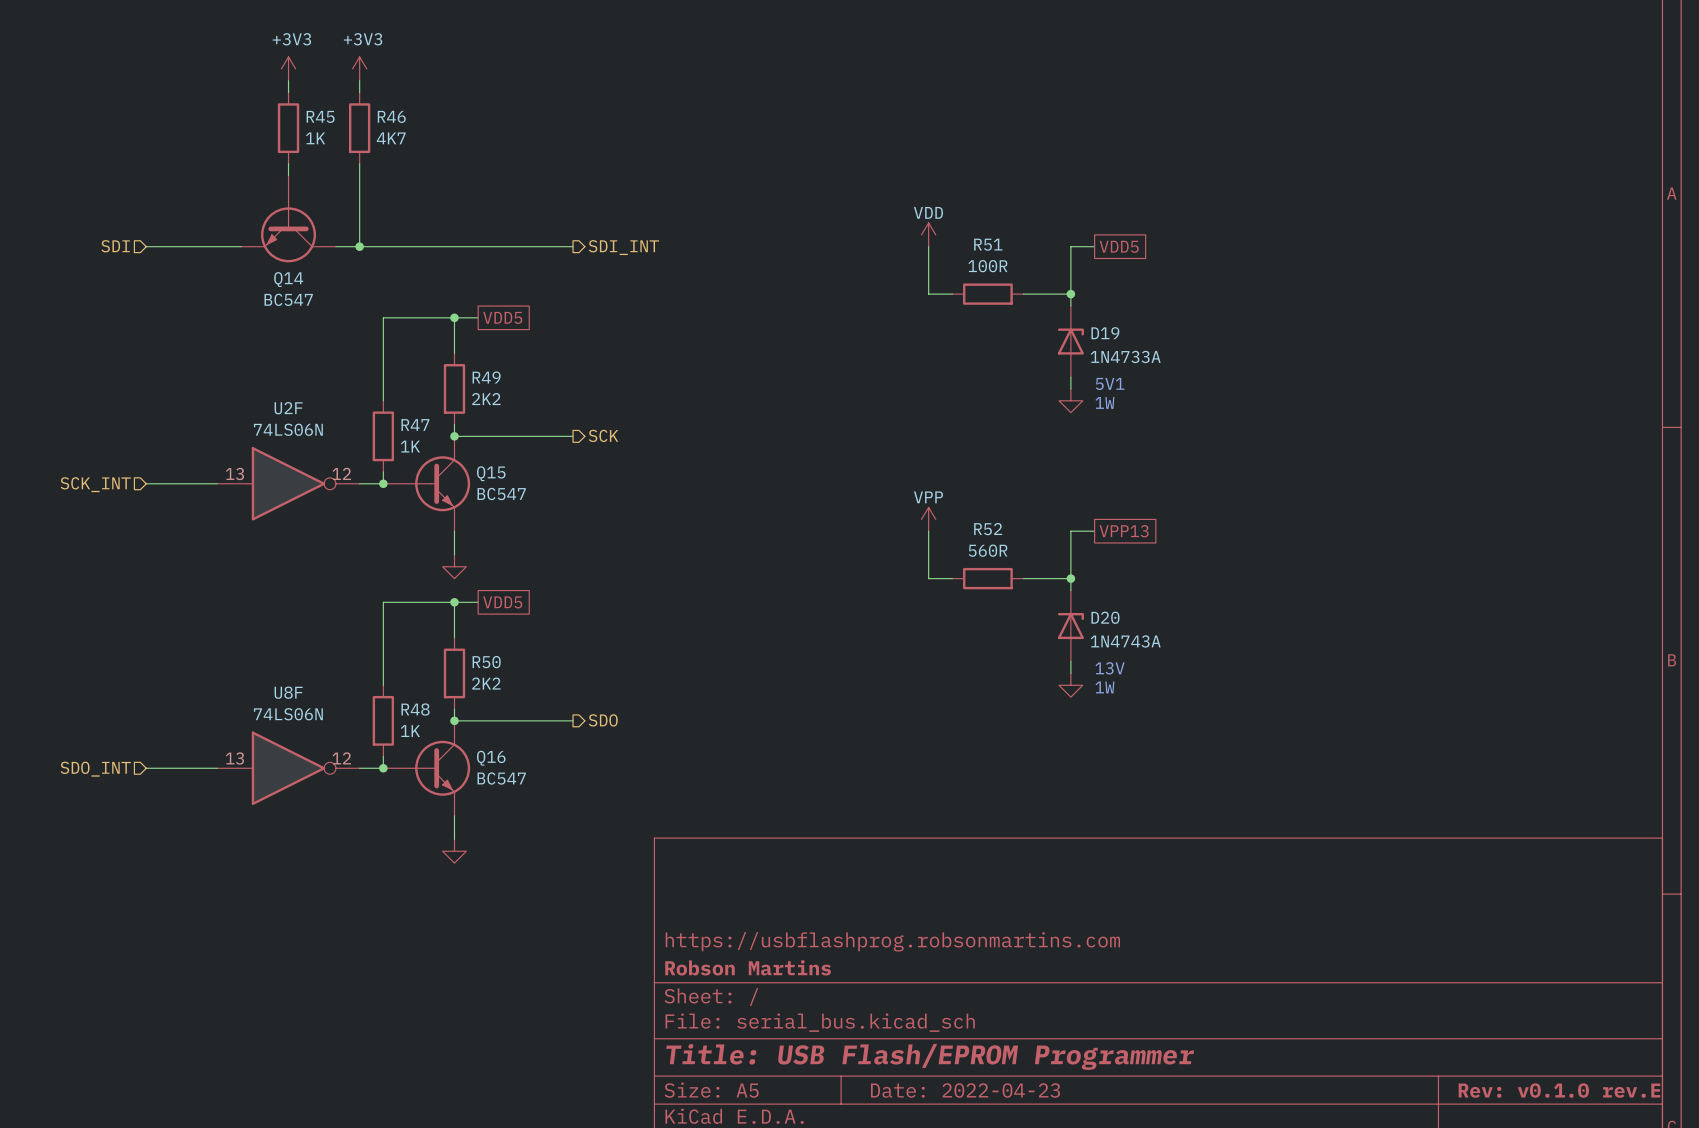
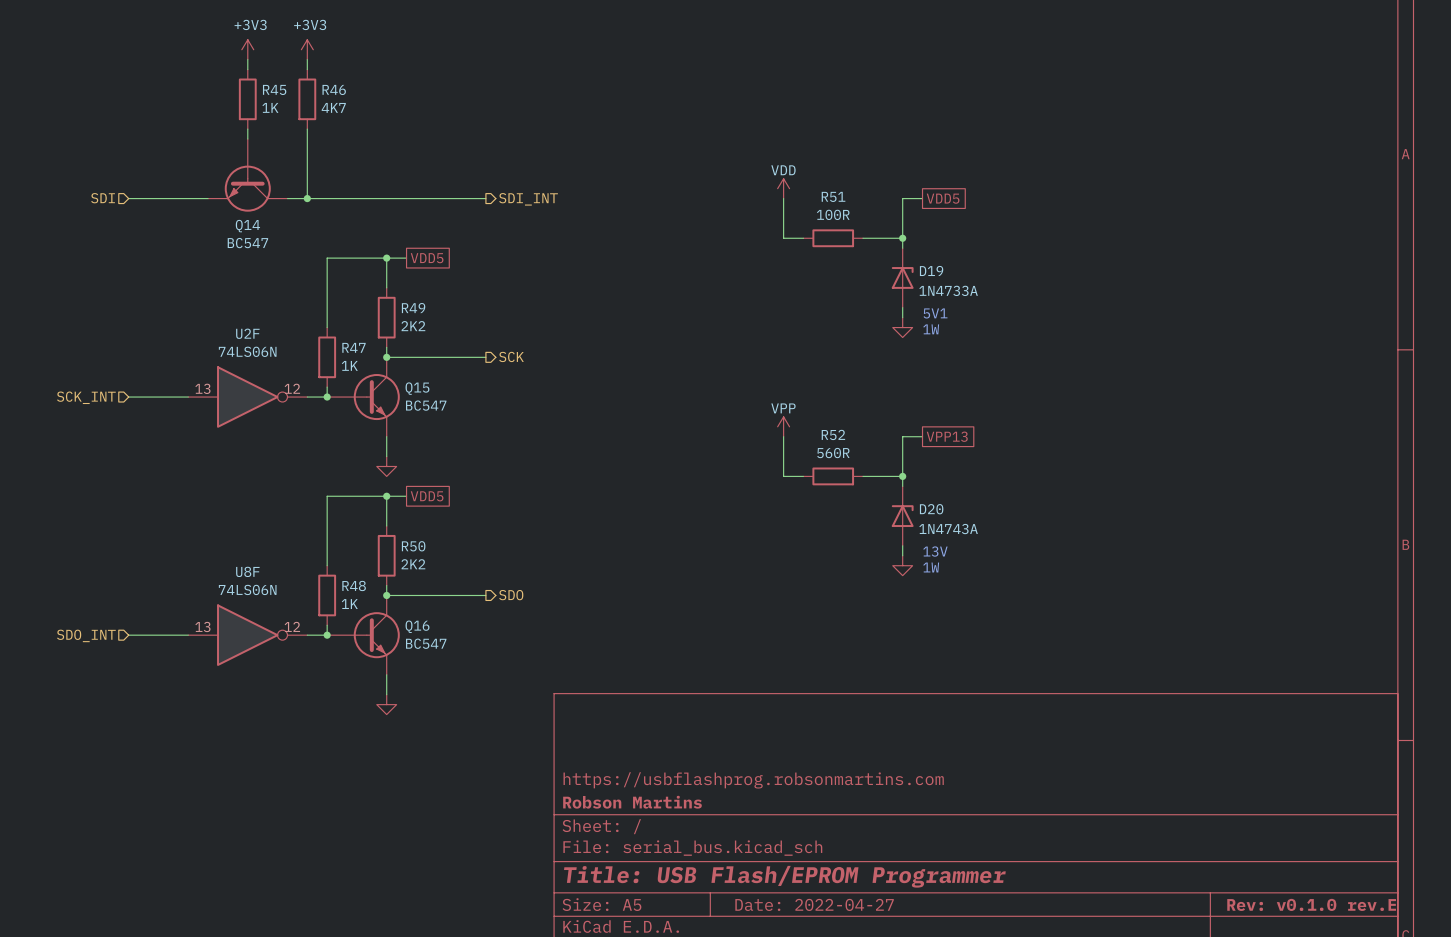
title block: Date: 2022-04-23 (965, 1090) -> Date: 2022-04-27 (814, 904)

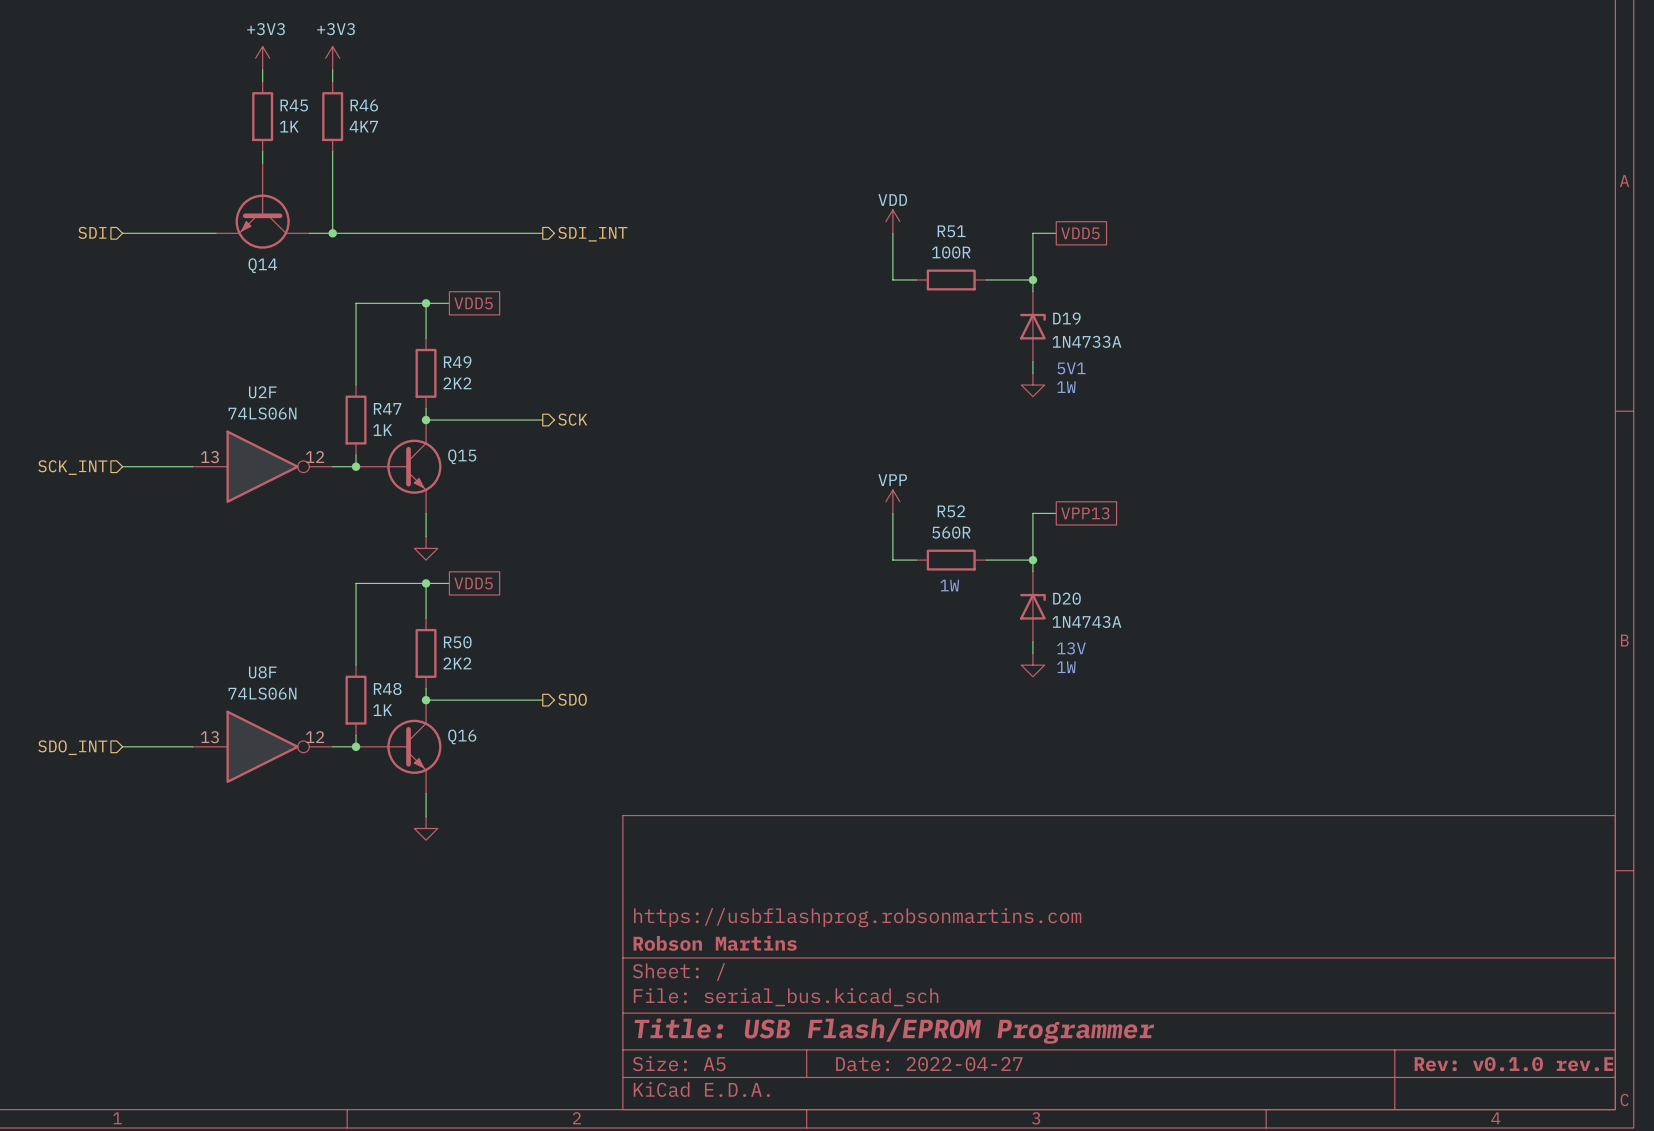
Q14 value: BC547 (247, 243) -> none
Q15 value: BC547 (426, 405) -> none
text: none -> 1W (949, 585)
Q16 value: BC547 (426, 643) -> none

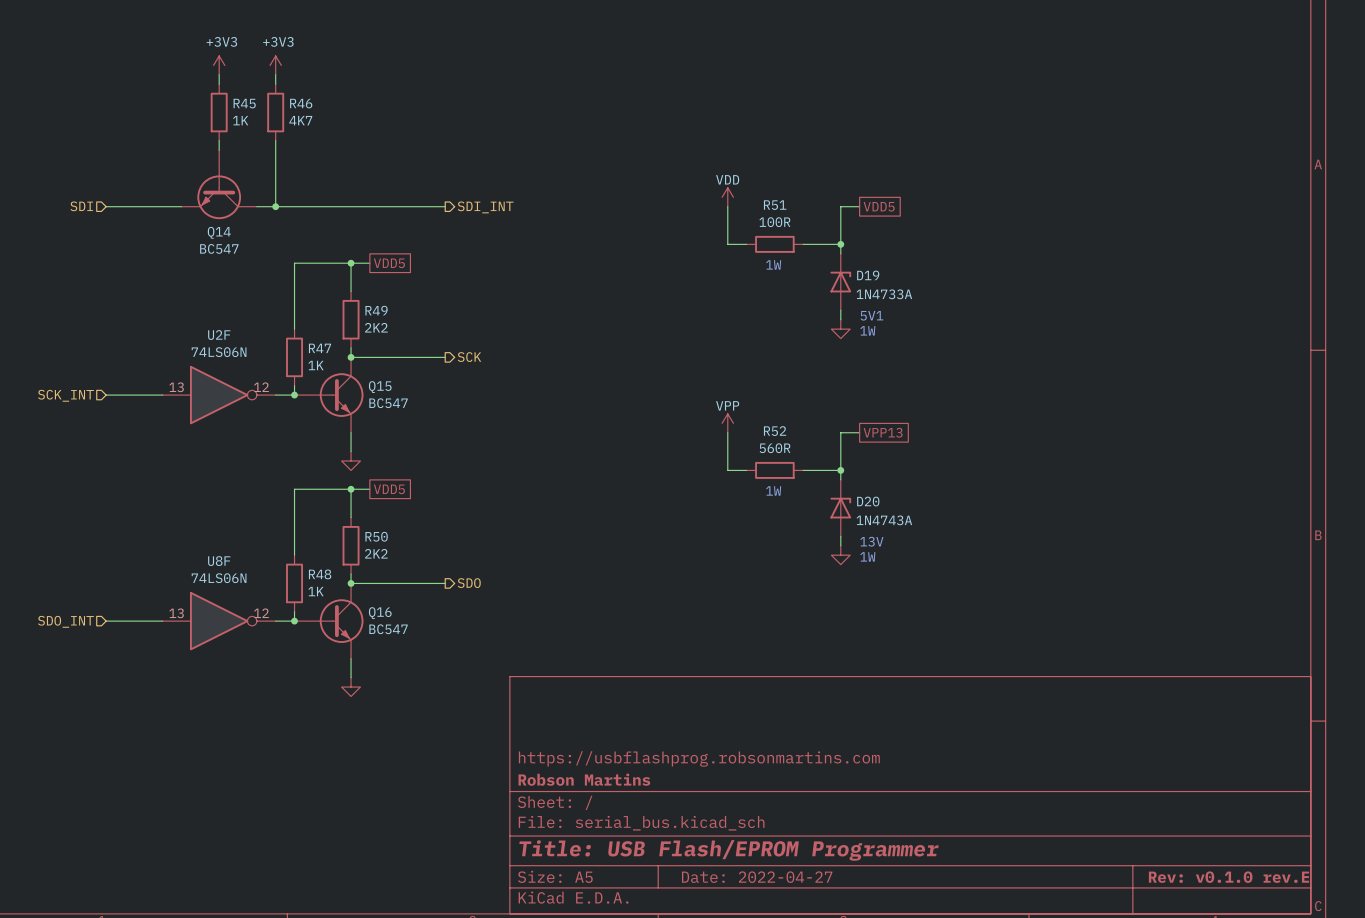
Q14 value: none -> BC547 (219, 248)
text: none -> 1W (773, 264)
Q15 value: none -> BC547 (388, 403)
Q16 value: none -> BC547 (388, 629)

